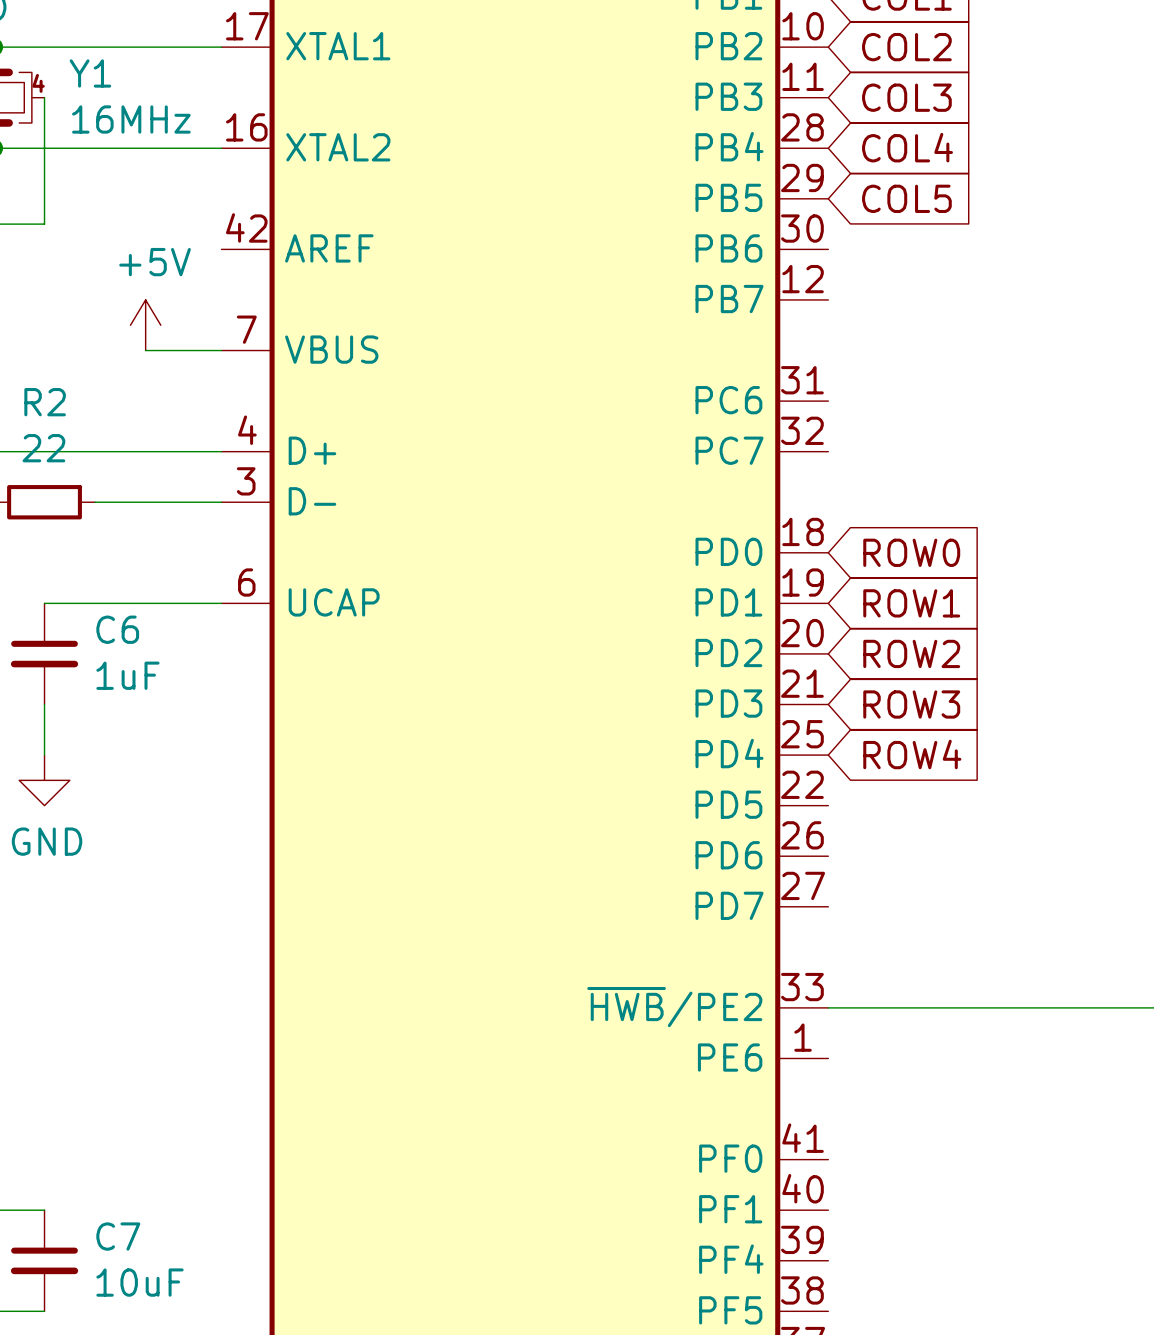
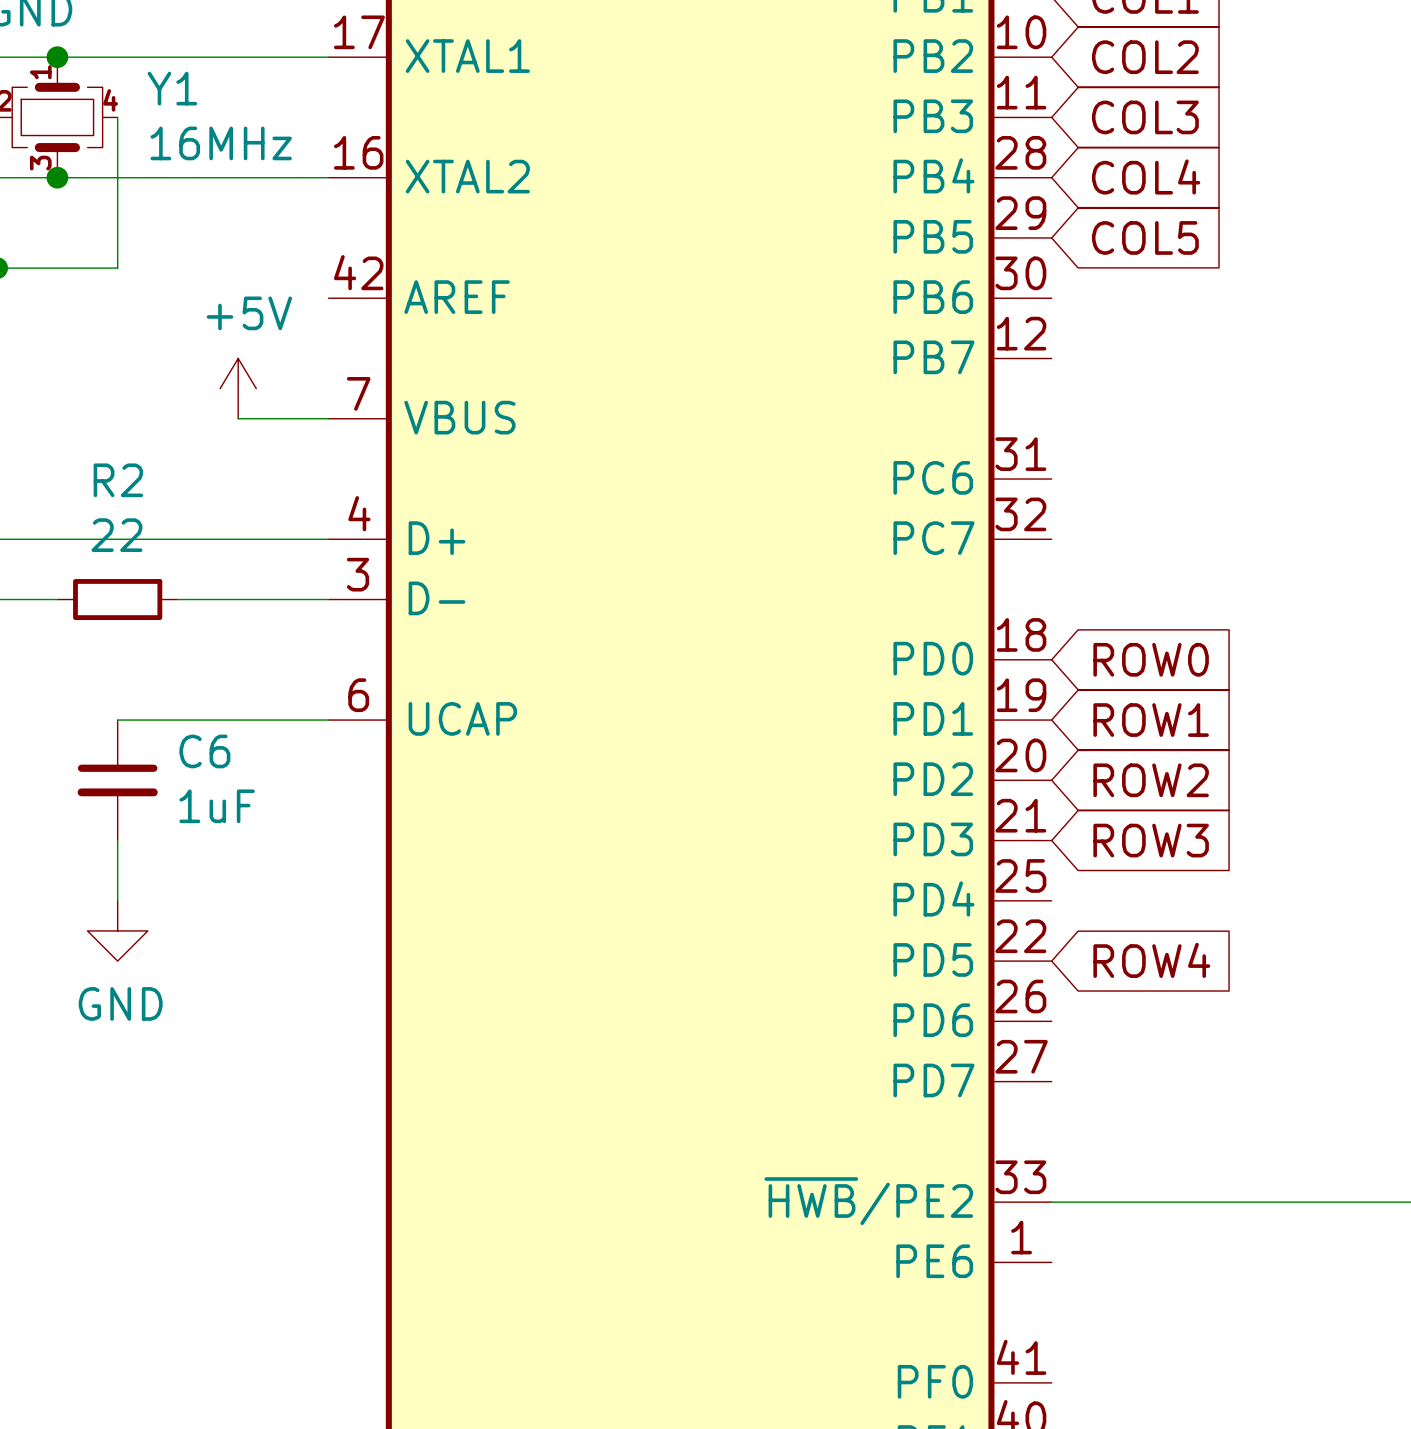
global label position: ROW4 (912, 754) -> ROW4 (1151, 960)

